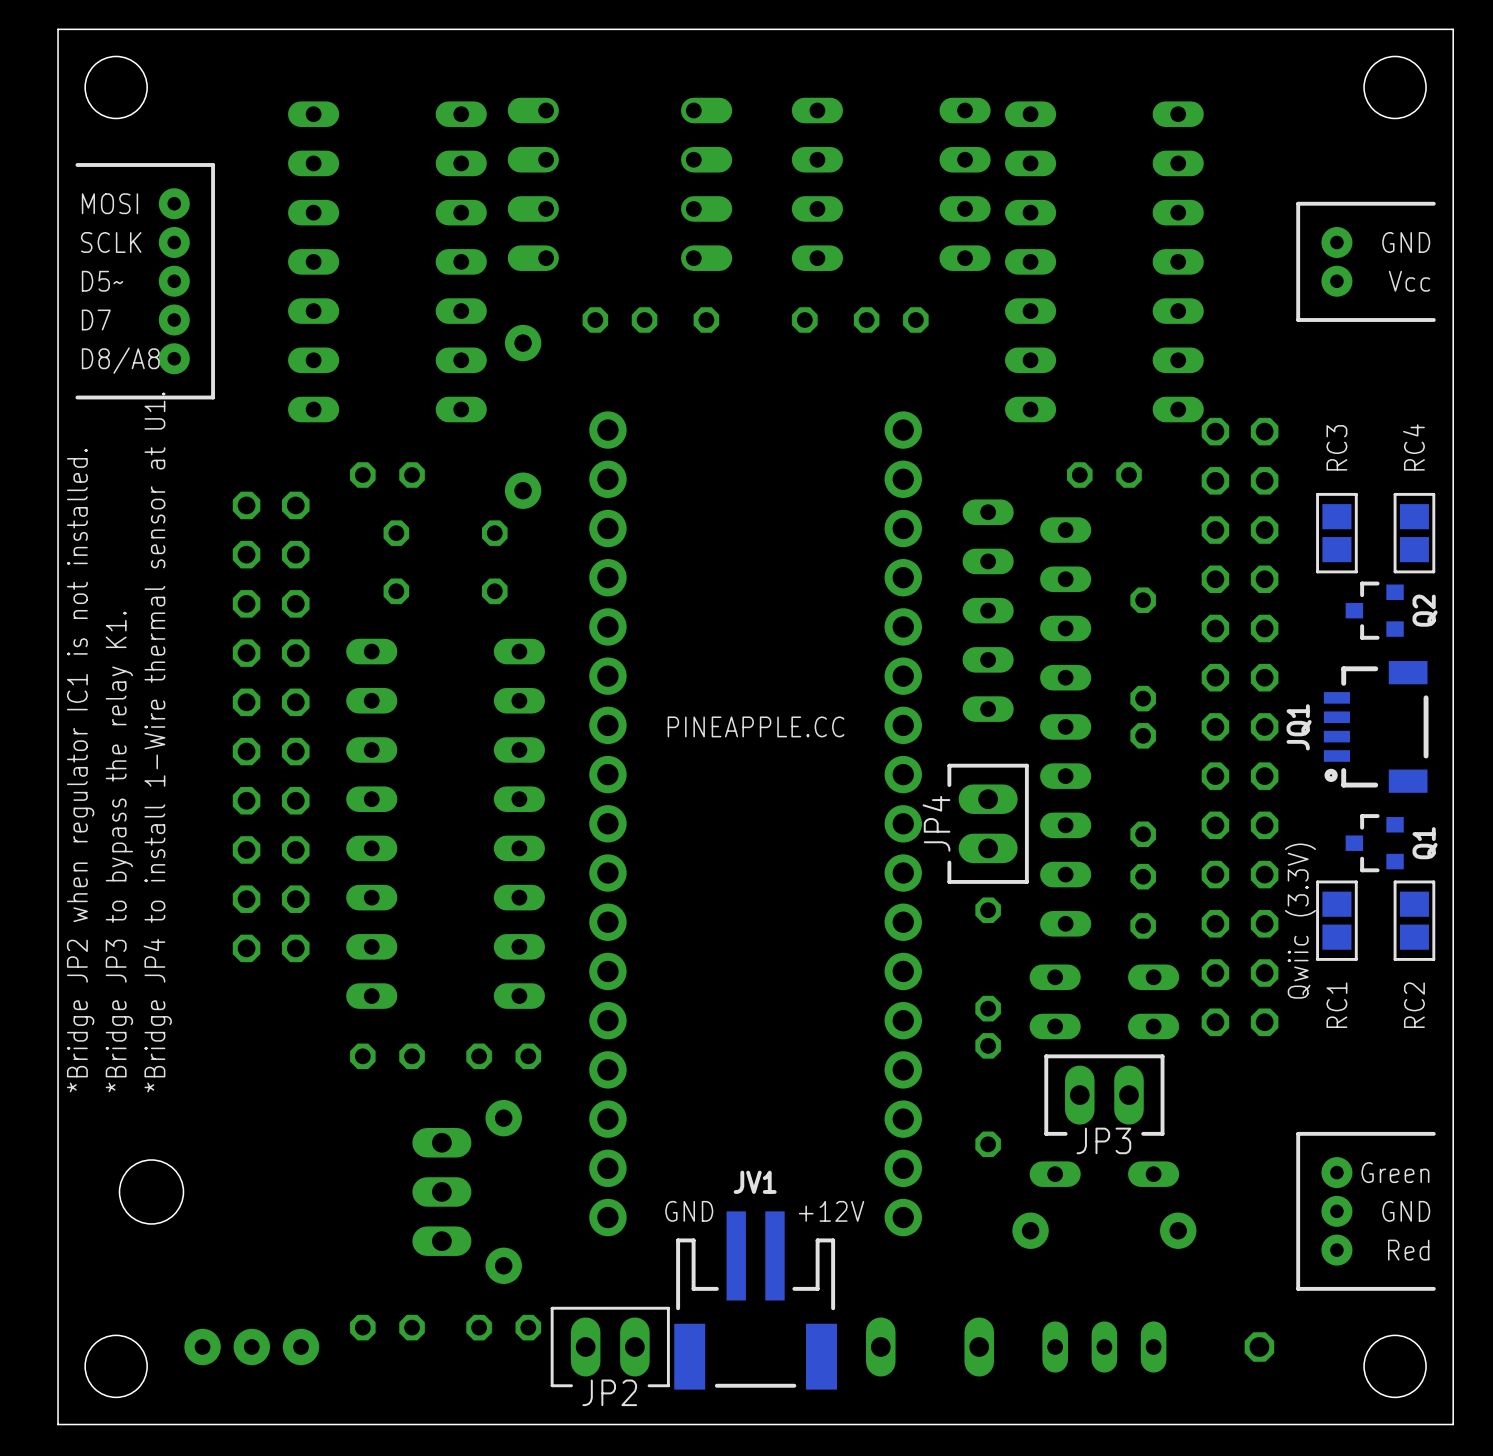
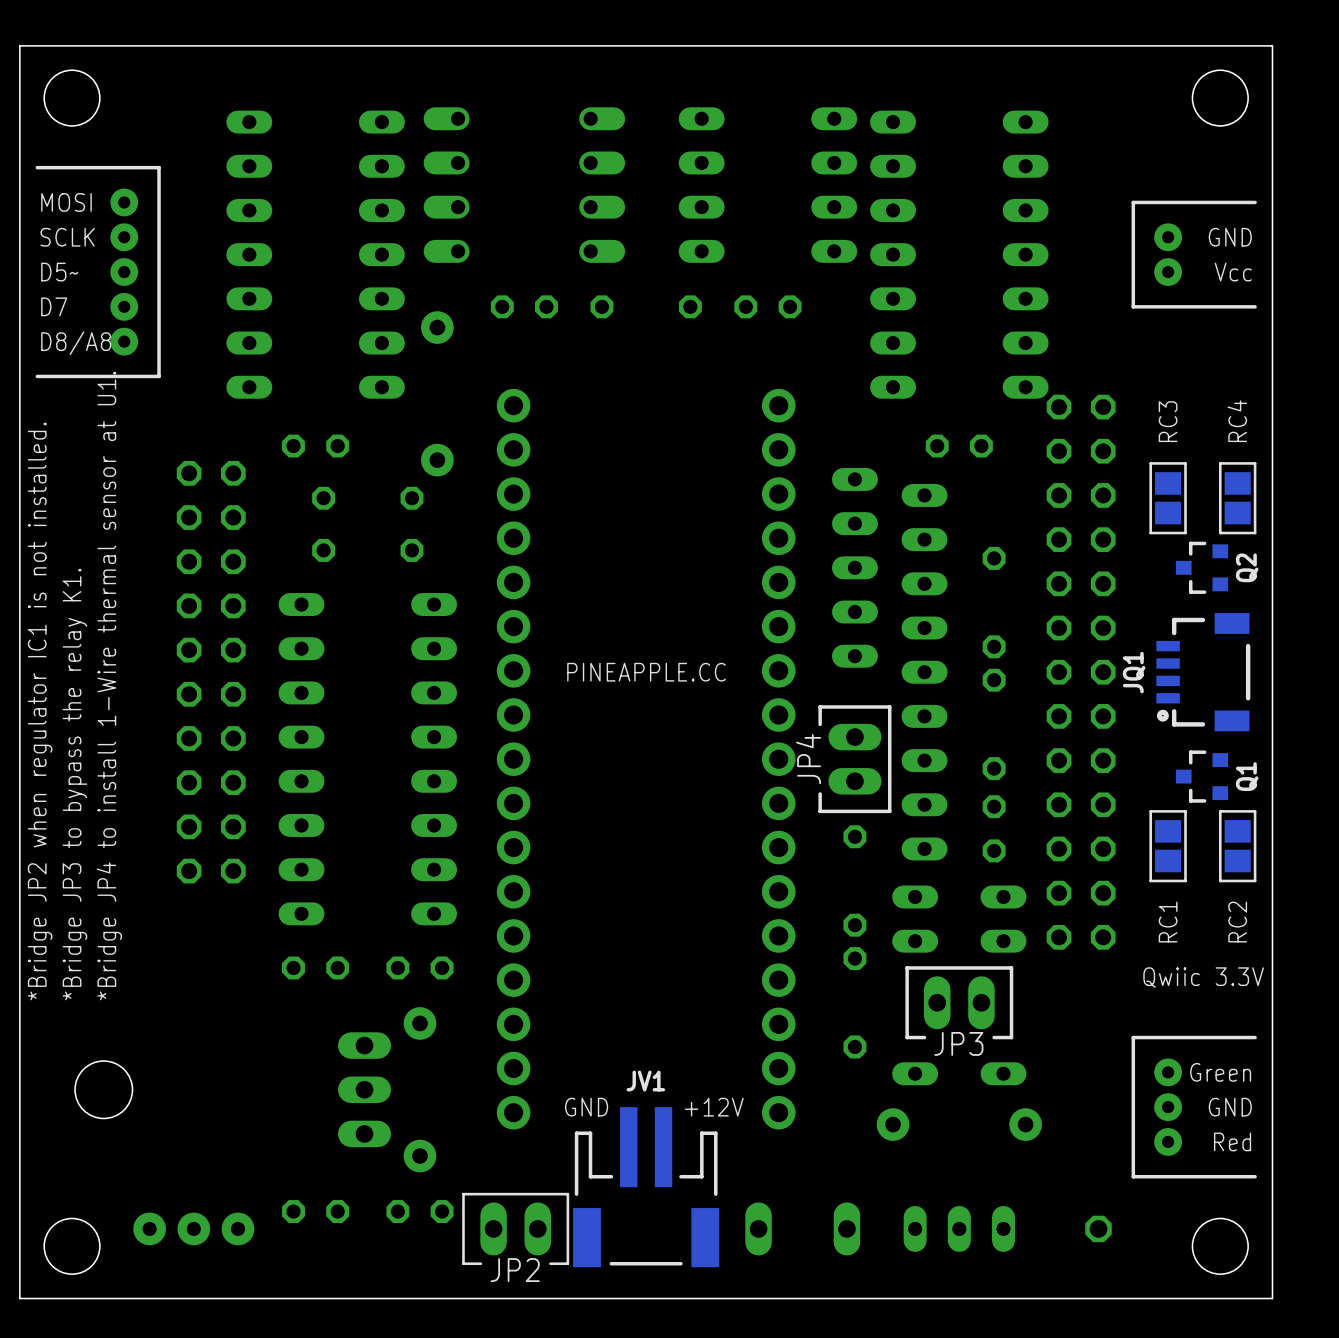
text: Qwiic (3.3V) (1300, 921) -> none
text: none -> Qwiic 3.3V (1203, 977)

